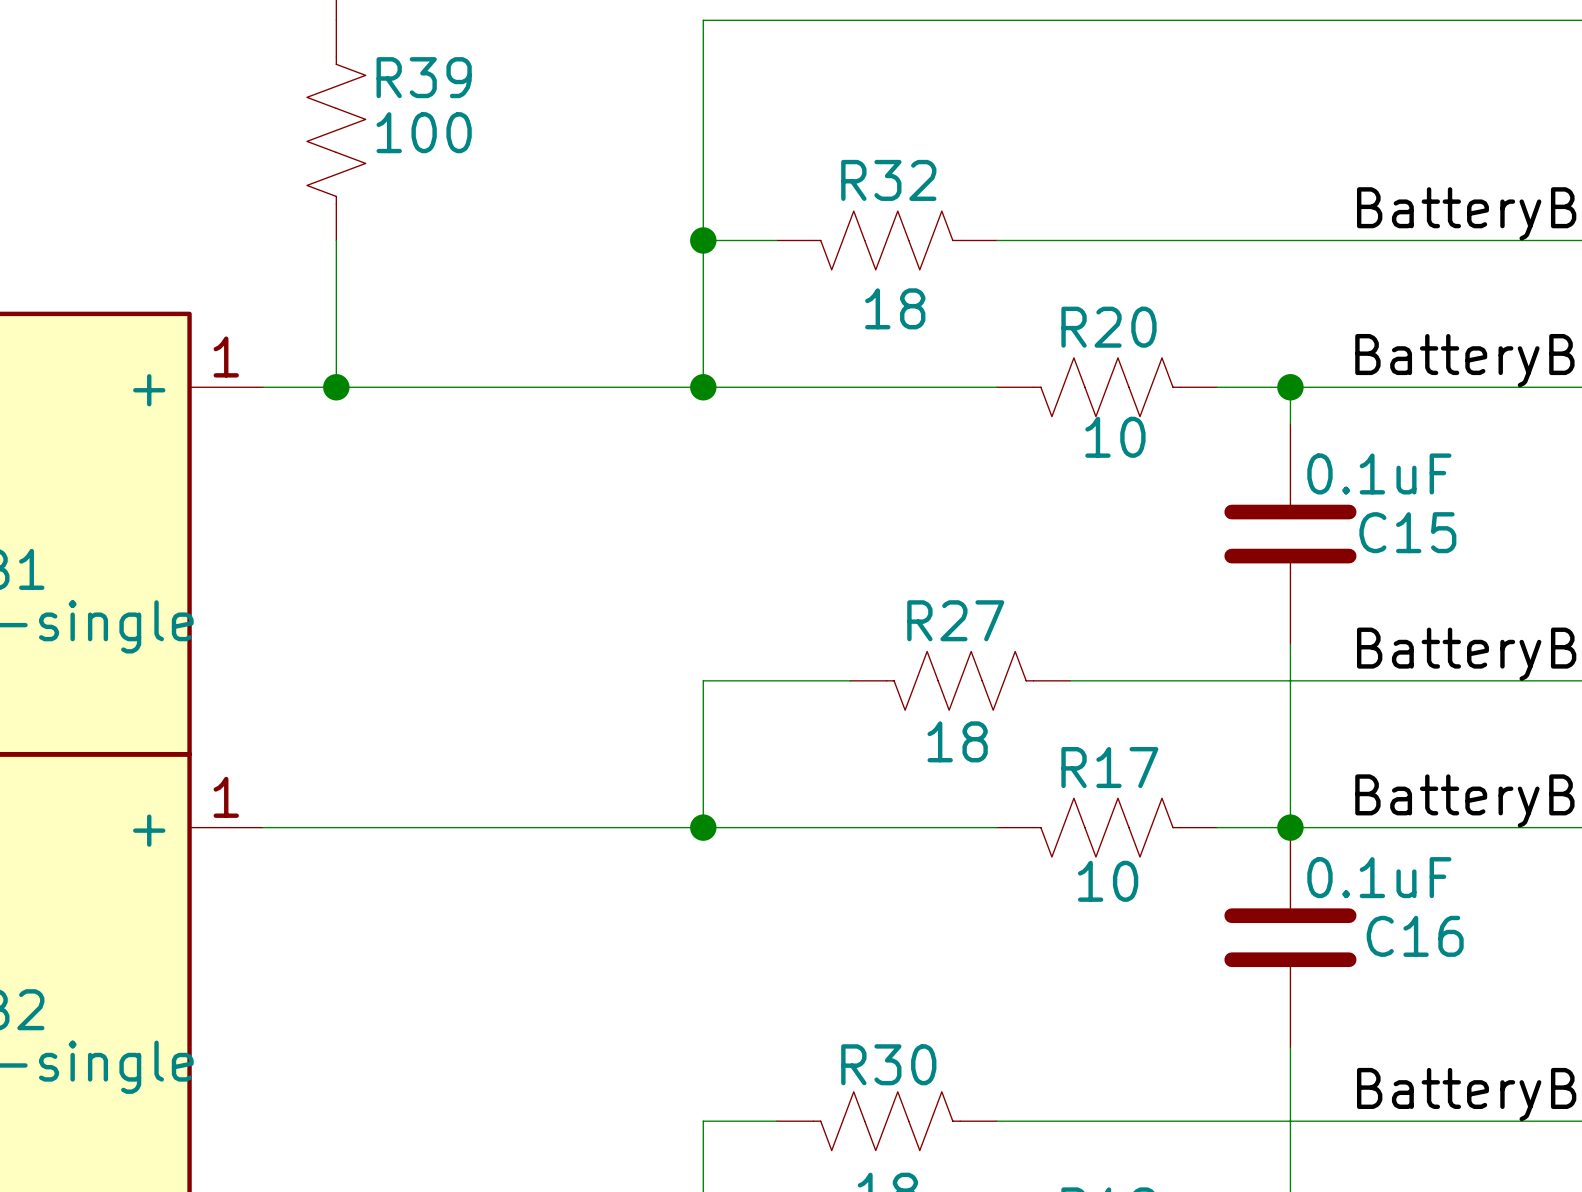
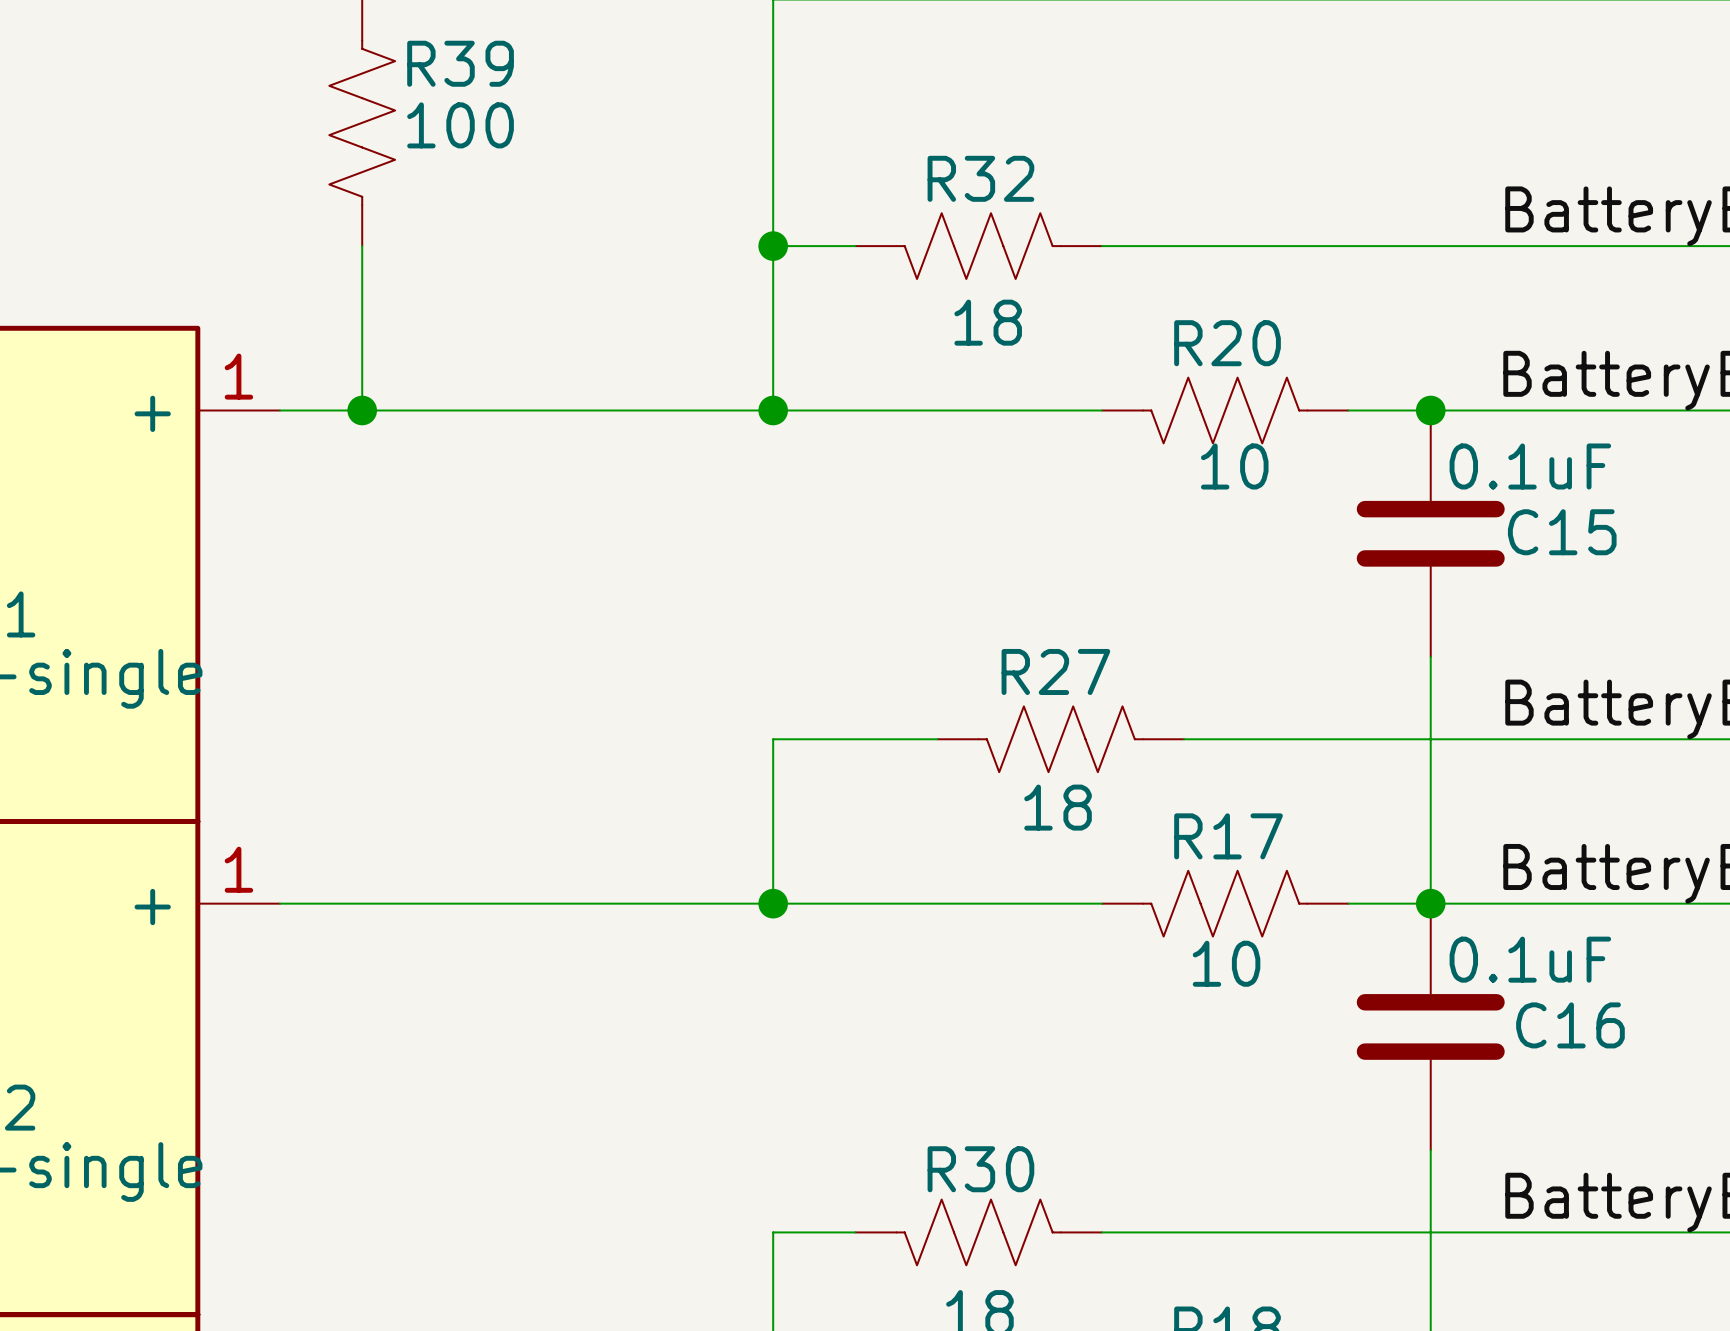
C15 position: (1290, 534) -> (1430, 533)

